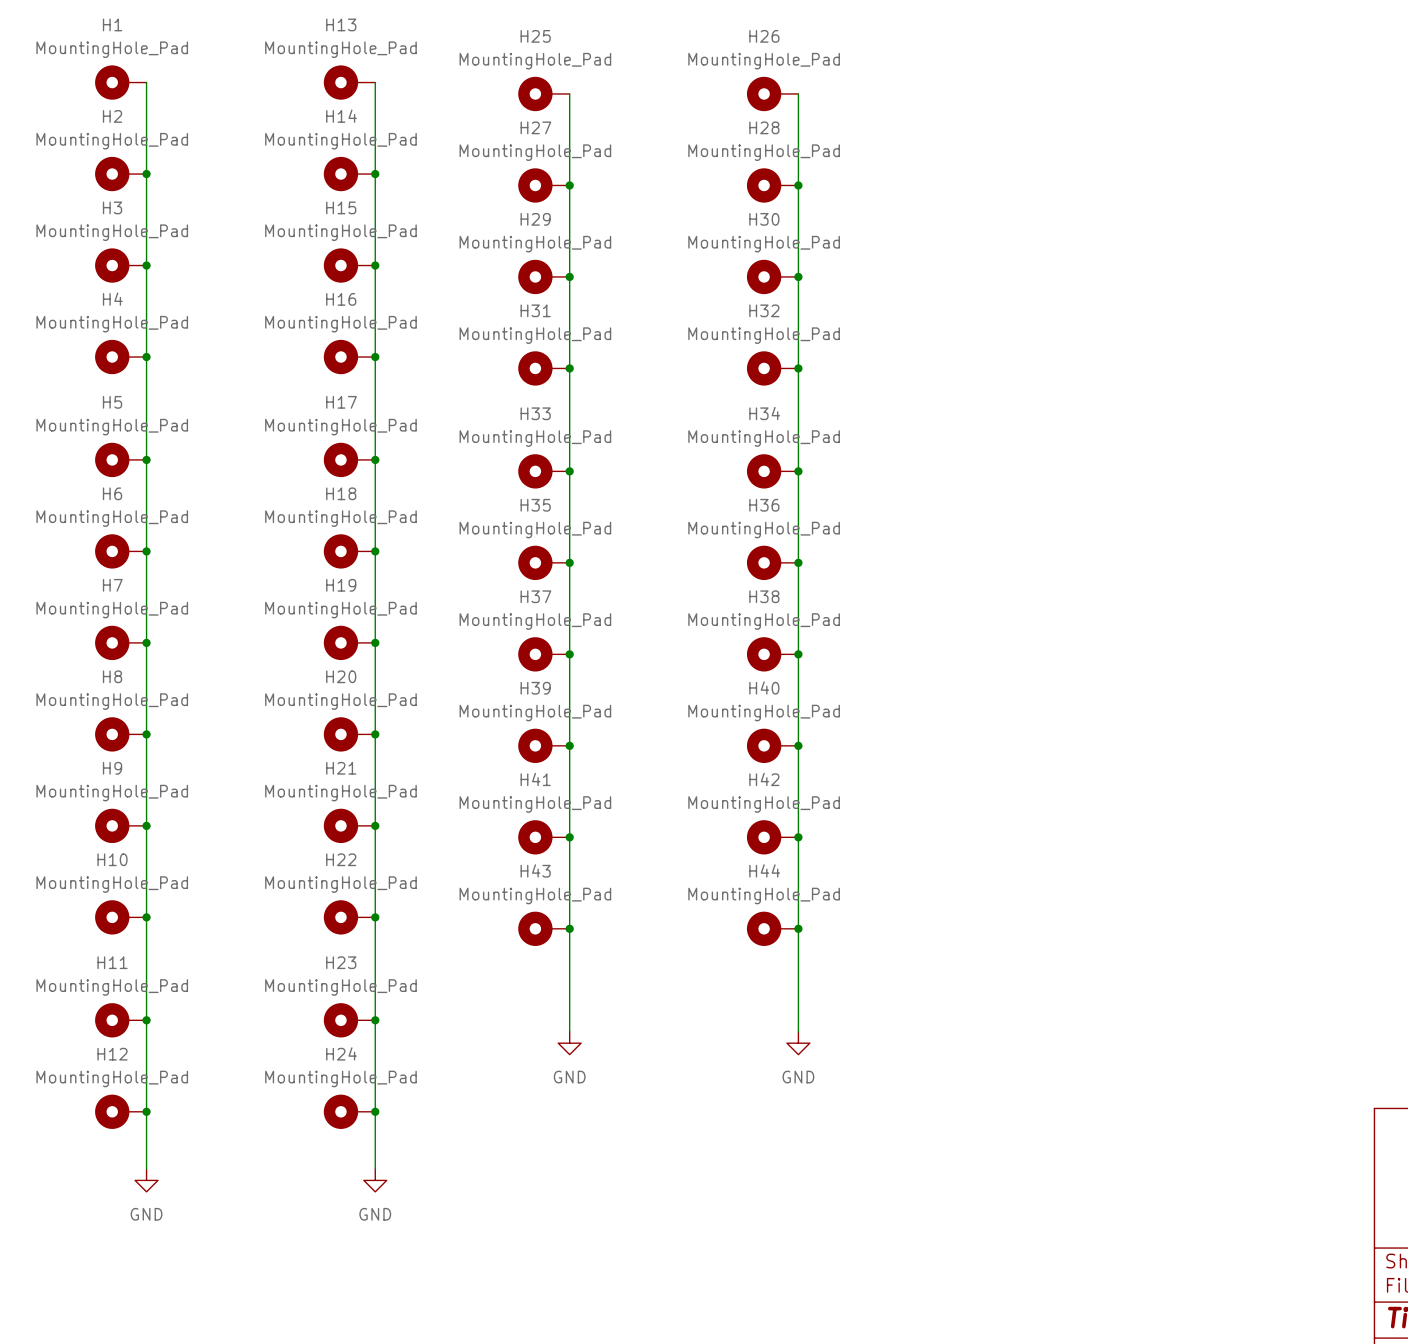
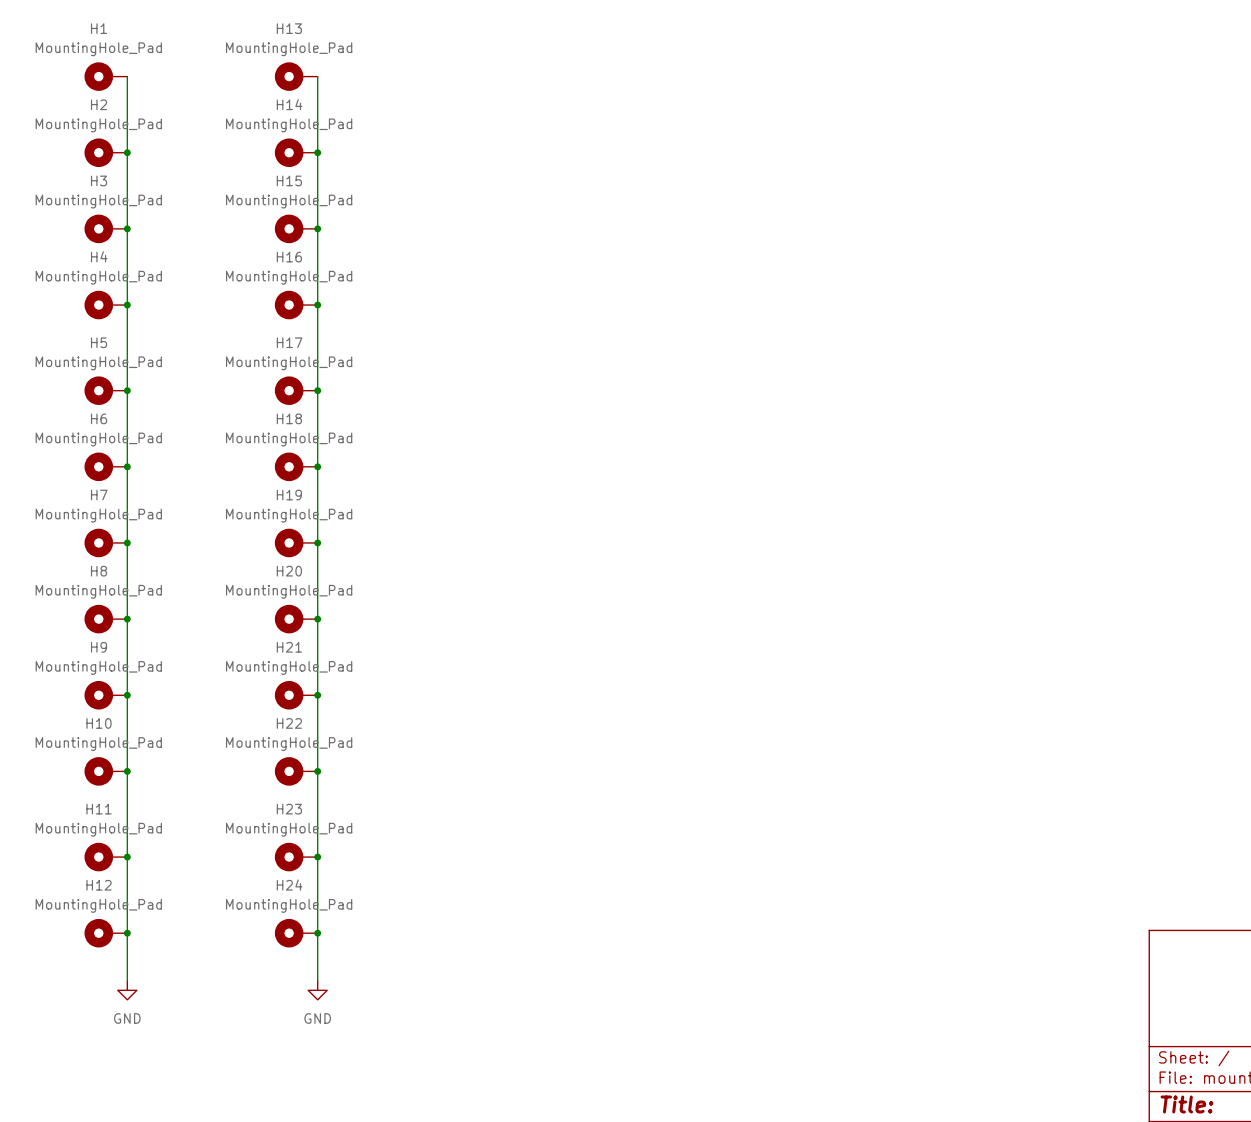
H25: MountingHole_Pad (543, 93) -> none
wire: (569, 93) (569, 1031) -> none
H26: MountingHole_Pad (772, 93) -> none
wire: (798, 93) (798, 1031) -> none
H27: MountingHole_Pad (543, 185) -> none
junction: (569, 185) -> none
H28: MountingHole_Pad (772, 185) -> none
junction: (798, 185) -> none
H29: MountingHole_Pad (543, 276) -> none
junction: (569, 276) -> none
H30: MountingHole_Pad (772, 276) -> none
junction: (798, 276) -> none
H31: MountingHole_Pad (543, 368) -> none
junction: (569, 368) -> none
H32: MountingHole_Pad (772, 368) -> none
junction: (798, 368) -> none
H33: MountingHole_Pad (543, 471) -> none
junction: (569, 471) -> none
H34: MountingHole_Pad (772, 471) -> none
junction: (798, 471) -> none
H35: MountingHole_Pad (543, 562) -> none
junction: (569, 562) -> none
H36: MountingHole_Pad (772, 562) -> none
junction: (798, 562) -> none
H37: MountingHole_Pad (543, 654) -> none
junction: (569, 654) -> none
H38: MountingHole_Pad (772, 654) -> none
junction: (798, 654) -> none
H39: MountingHole_Pad (543, 745) -> none
junction: (569, 745) -> none
H40: MountingHole_Pad (772, 745) -> none
junction: (798, 745) -> none
H41: MountingHole_Pad (543, 837) -> none
junction: (569, 837) -> none
H42: MountingHole_Pad (772, 837) -> none
junction: (798, 837) -> none
H43: MountingHole_Pad (543, 928) -> none
junction: (569, 928) -> none
H44: MountingHole_Pad (772, 928) -> none
junction: (798, 928) -> none
power symbol: GND (569, 1043) -> none
power symbol: GND (798, 1043) -> none

